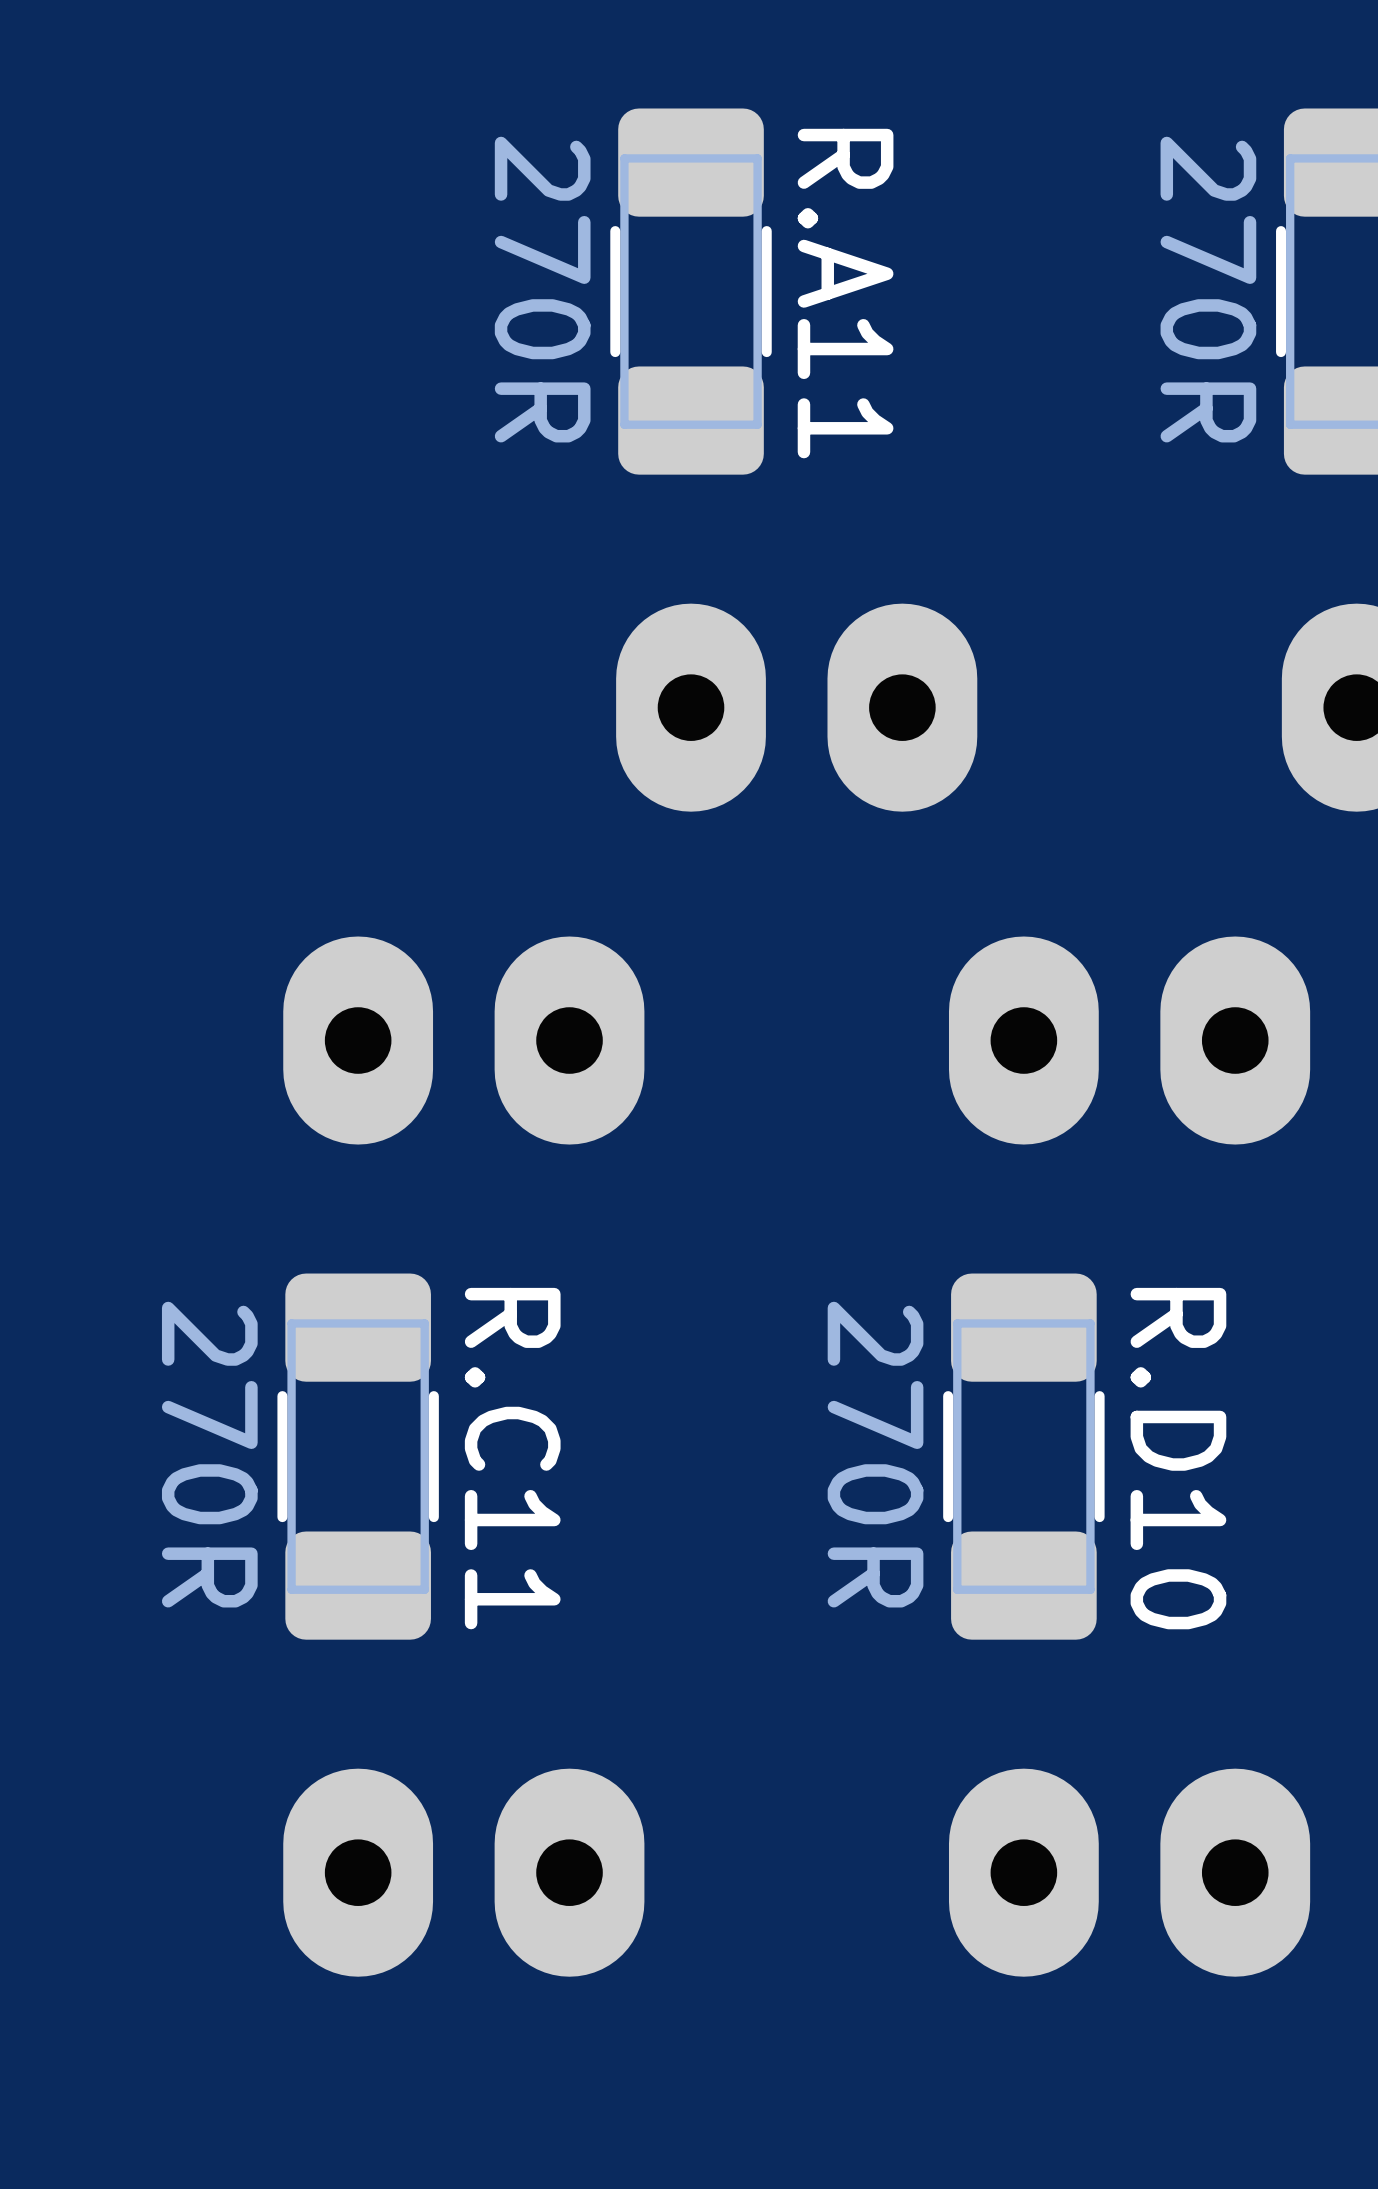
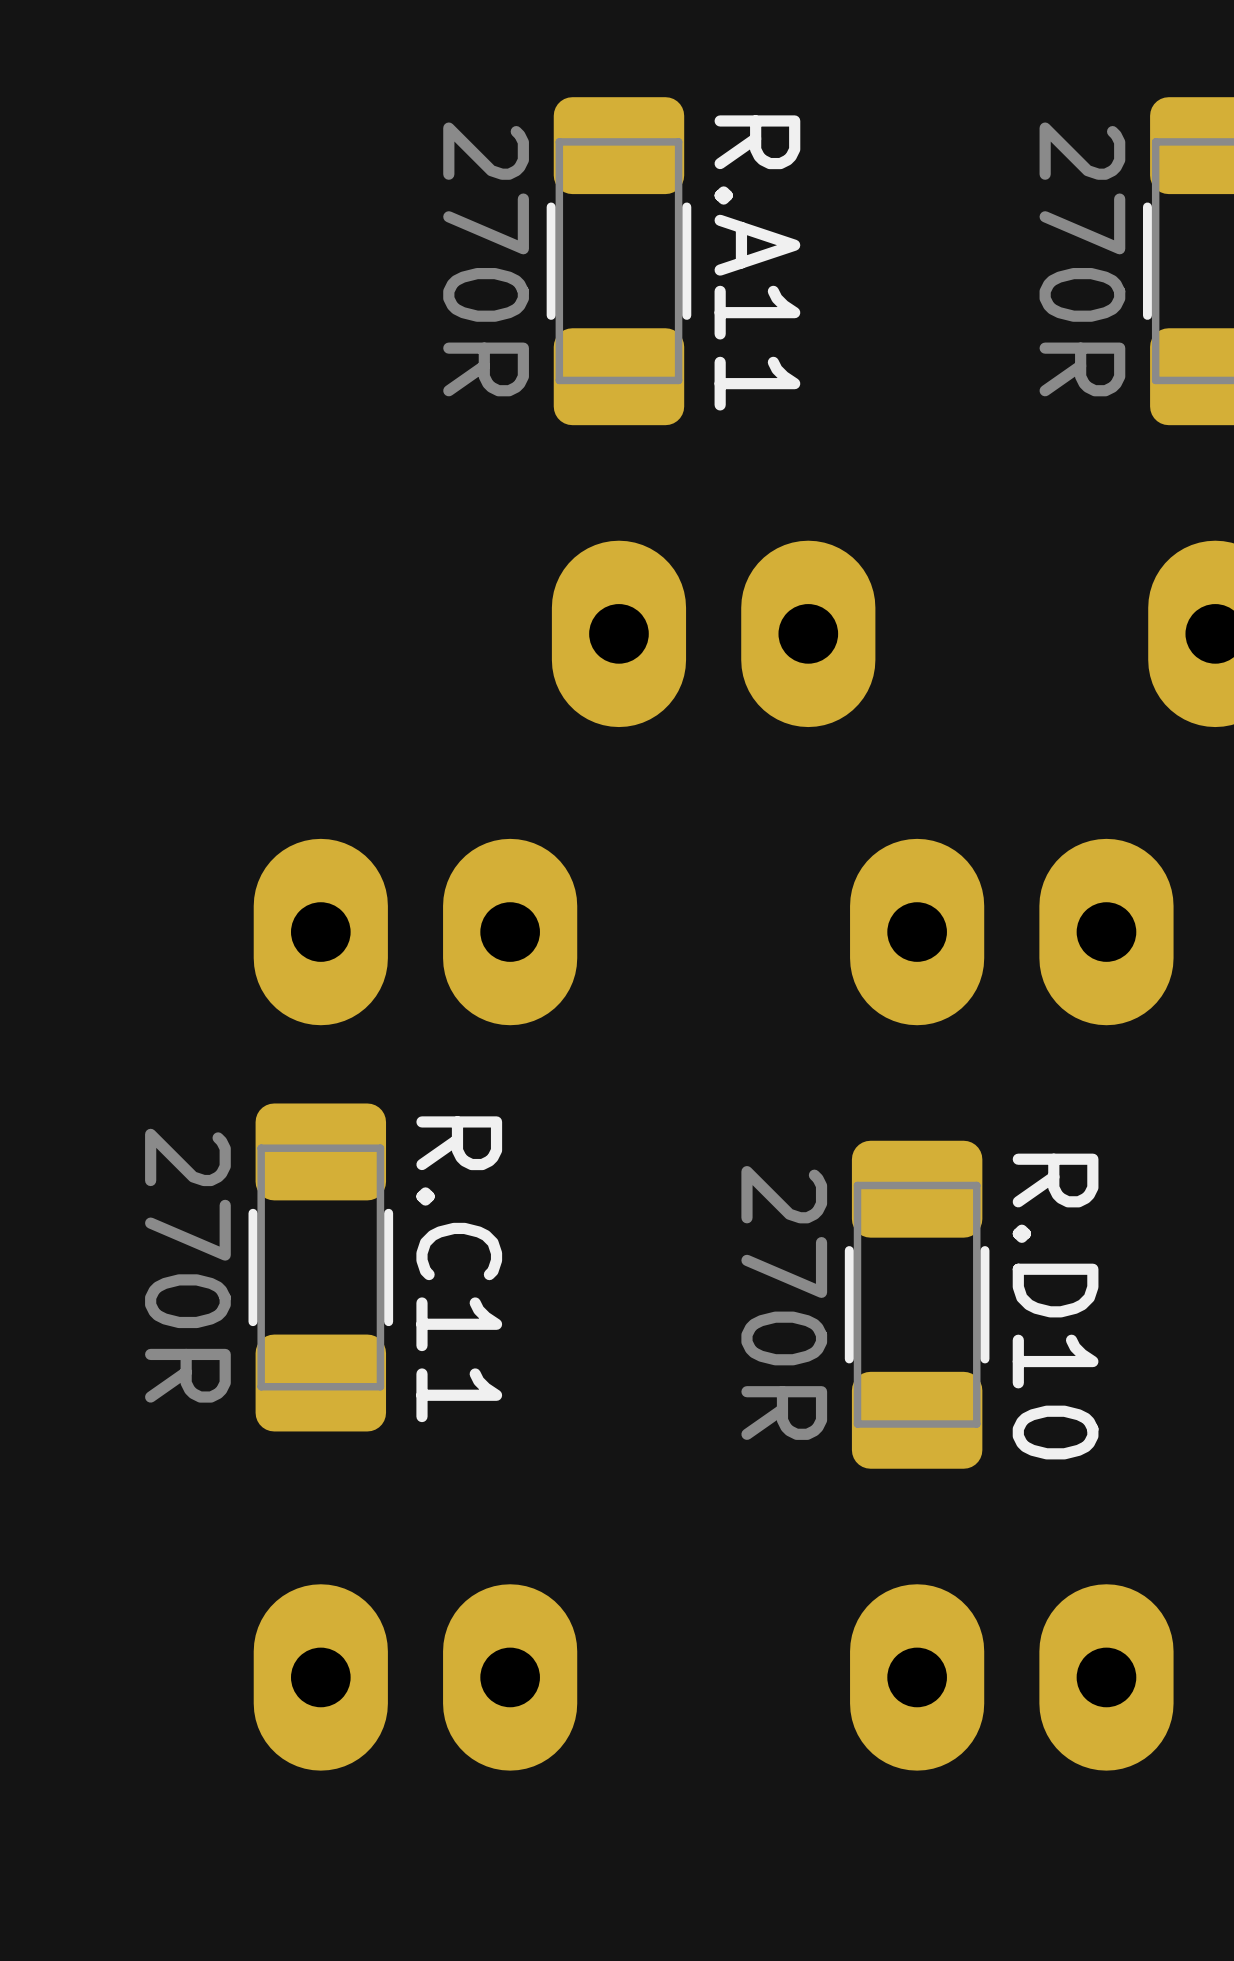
R.C11 position: (358, 1456) -> (320, 1267)

